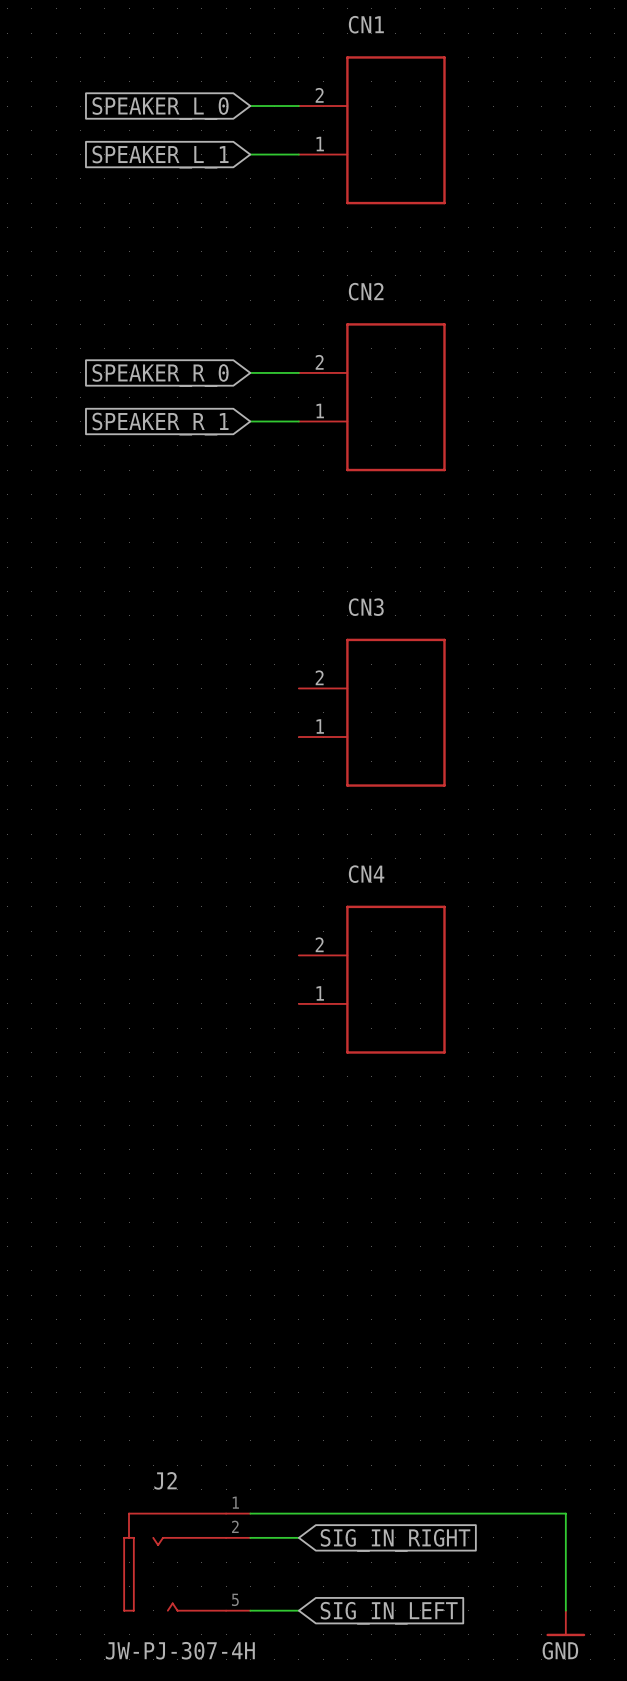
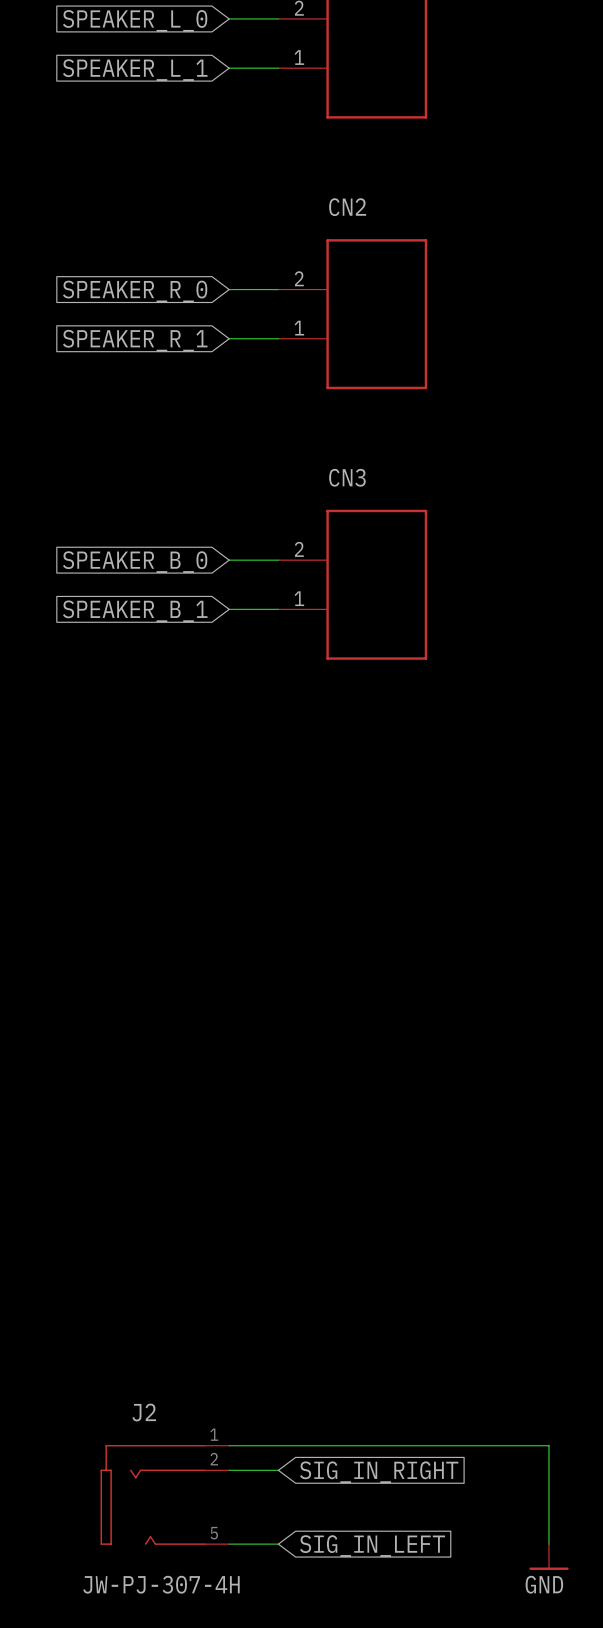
wire: none -> (229, 560) (278, 560)
global label: none -> SPEAKER_B_0 (135, 562)
wire: none -> (229, 609) (278, 609)
global label: none -> SPEAKER_B_1 (135, 611)
CN3 position: (372, 712) -> (352, 584)
CN4: (372, 979) -> none

